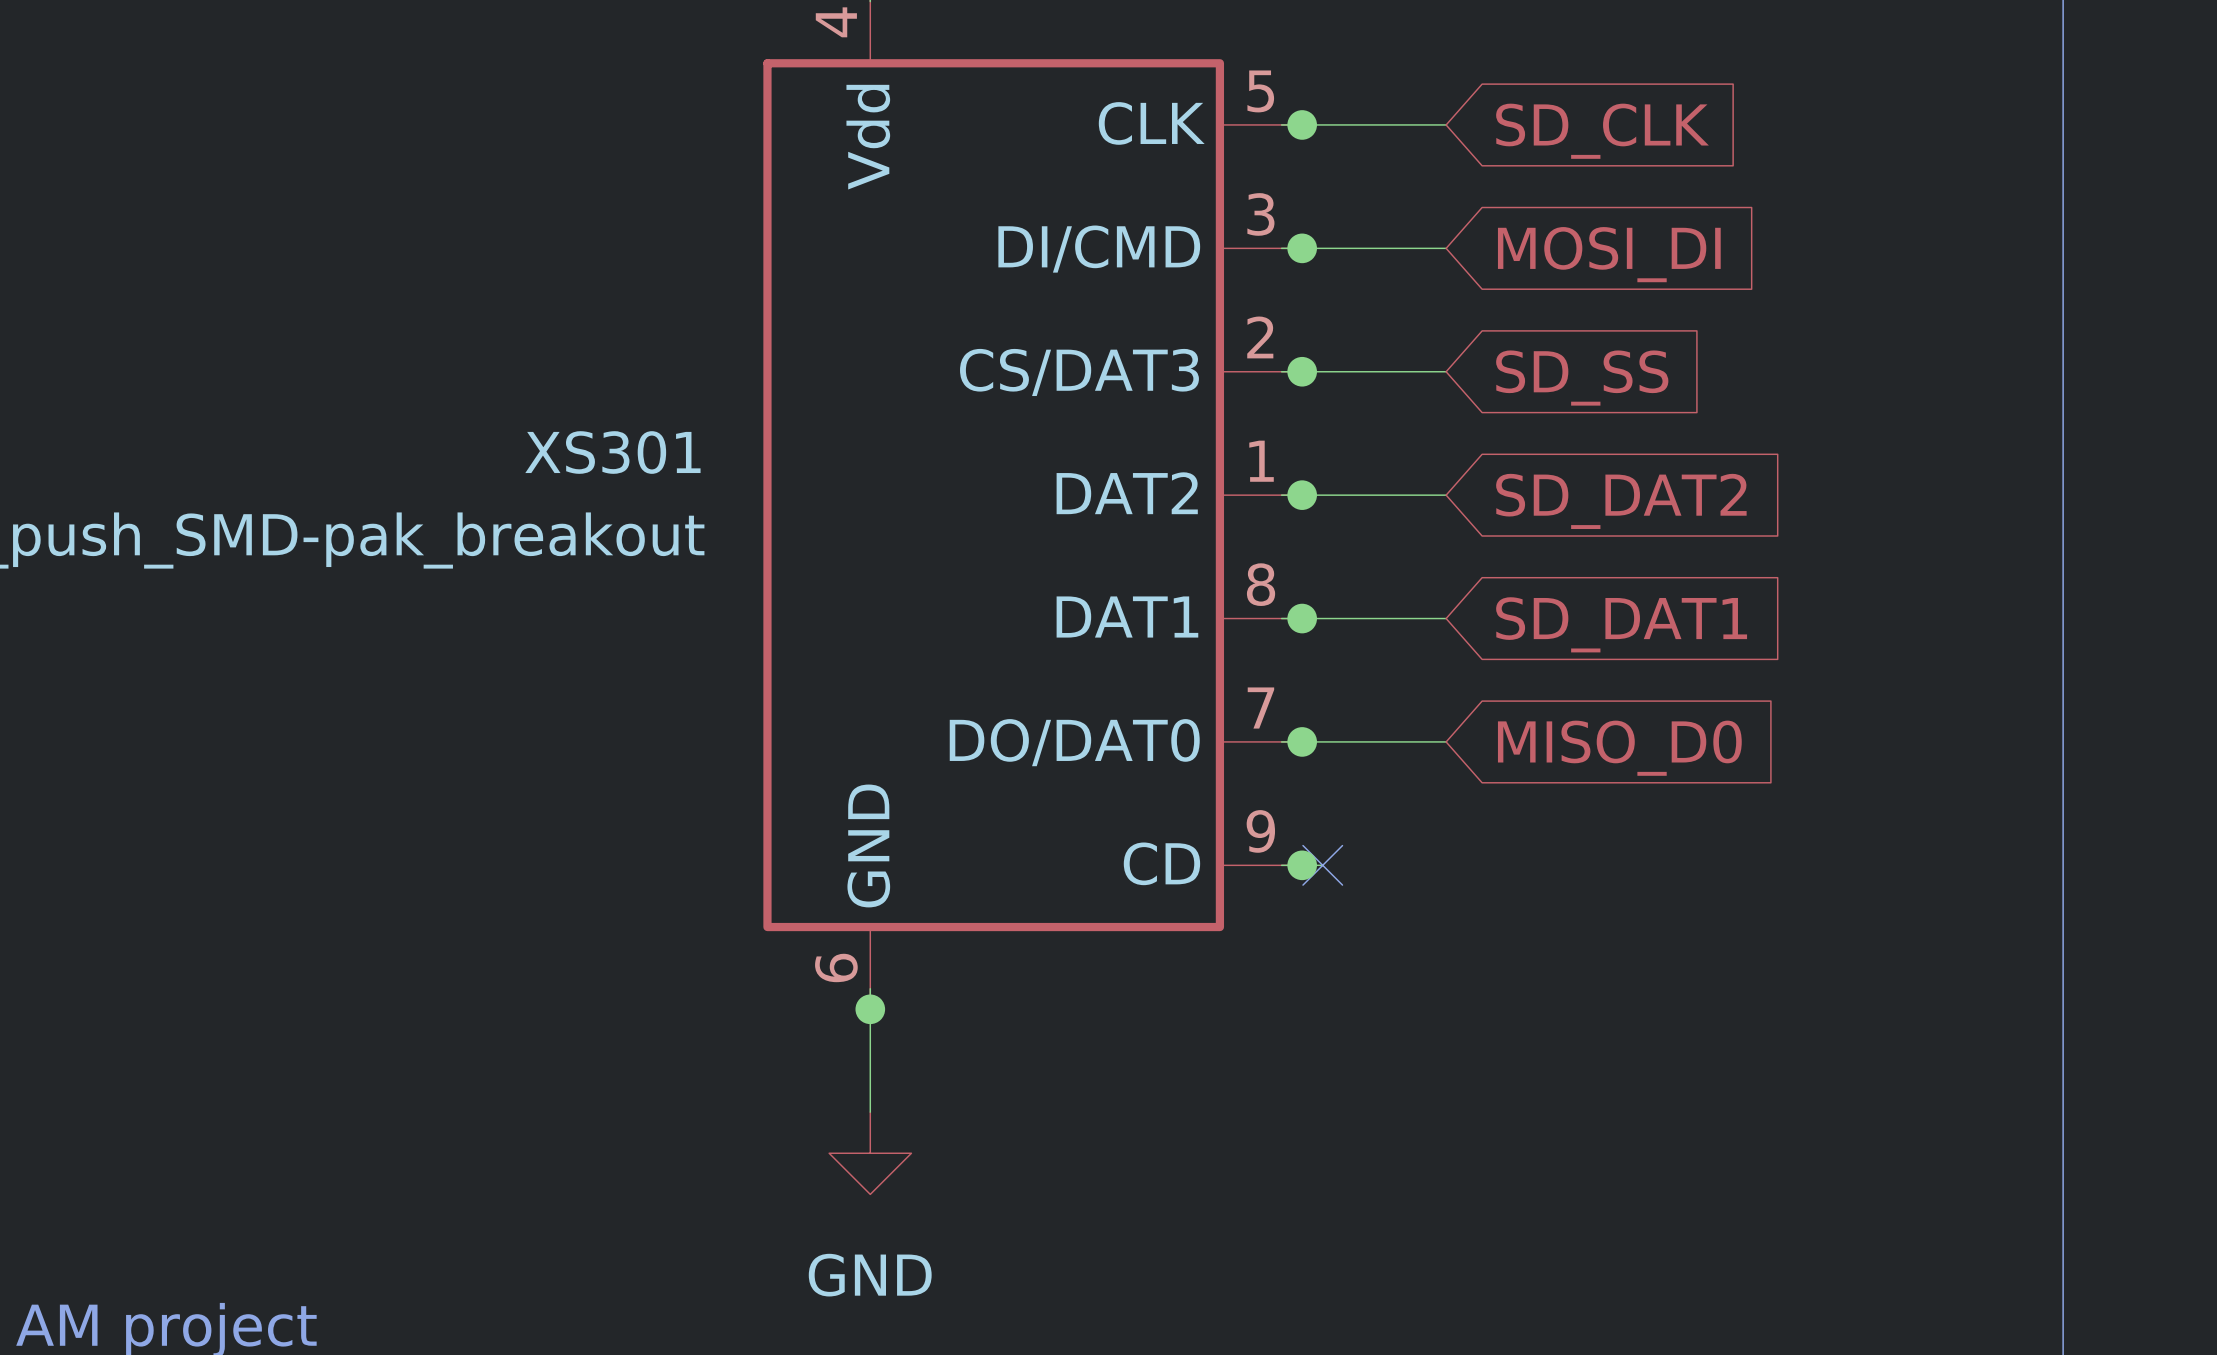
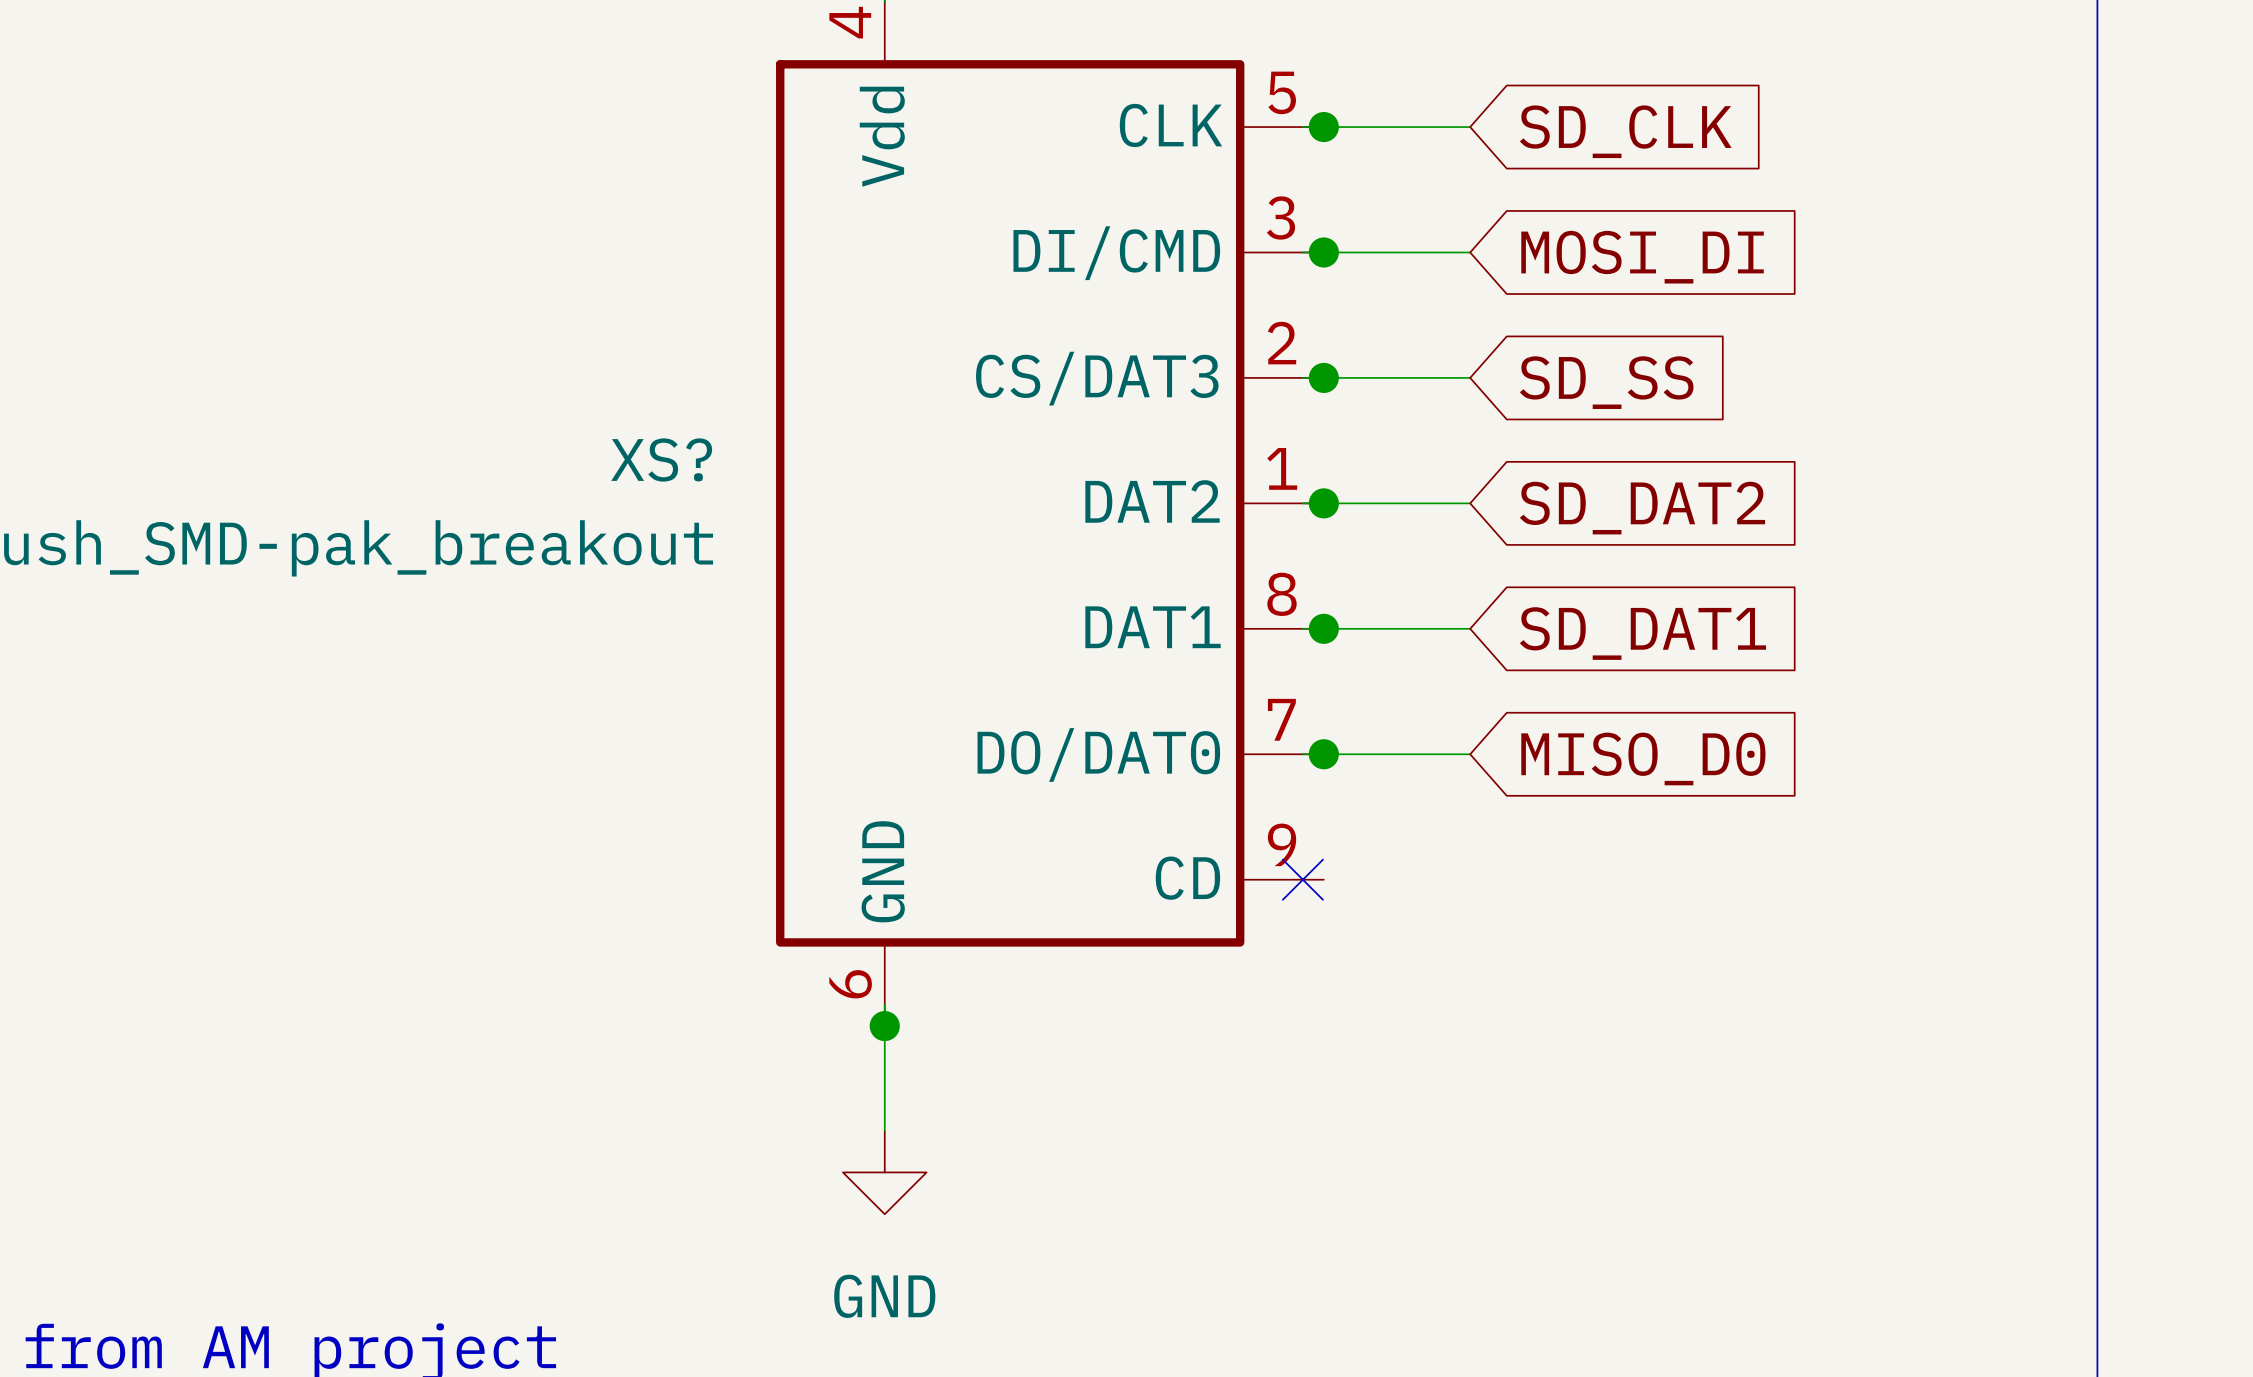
XS301 name: XS301 (612, 452) -> XS? (661, 459)
junction: (1302, 865) -> none
no-connect mark position: (1322, 865) -> (1302, 879)

